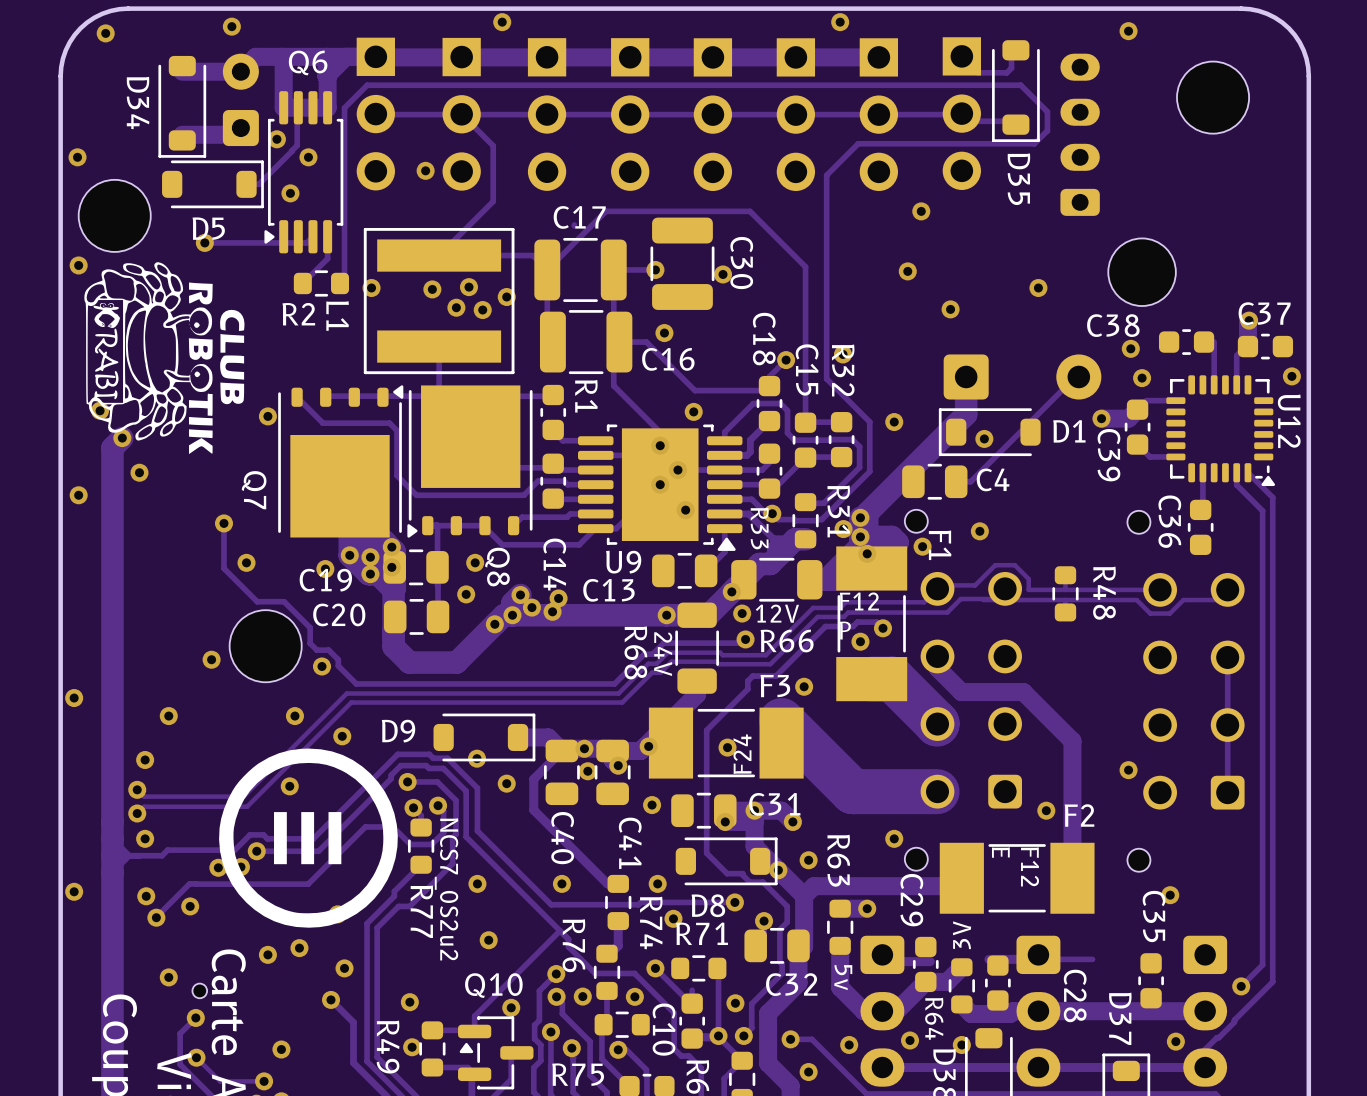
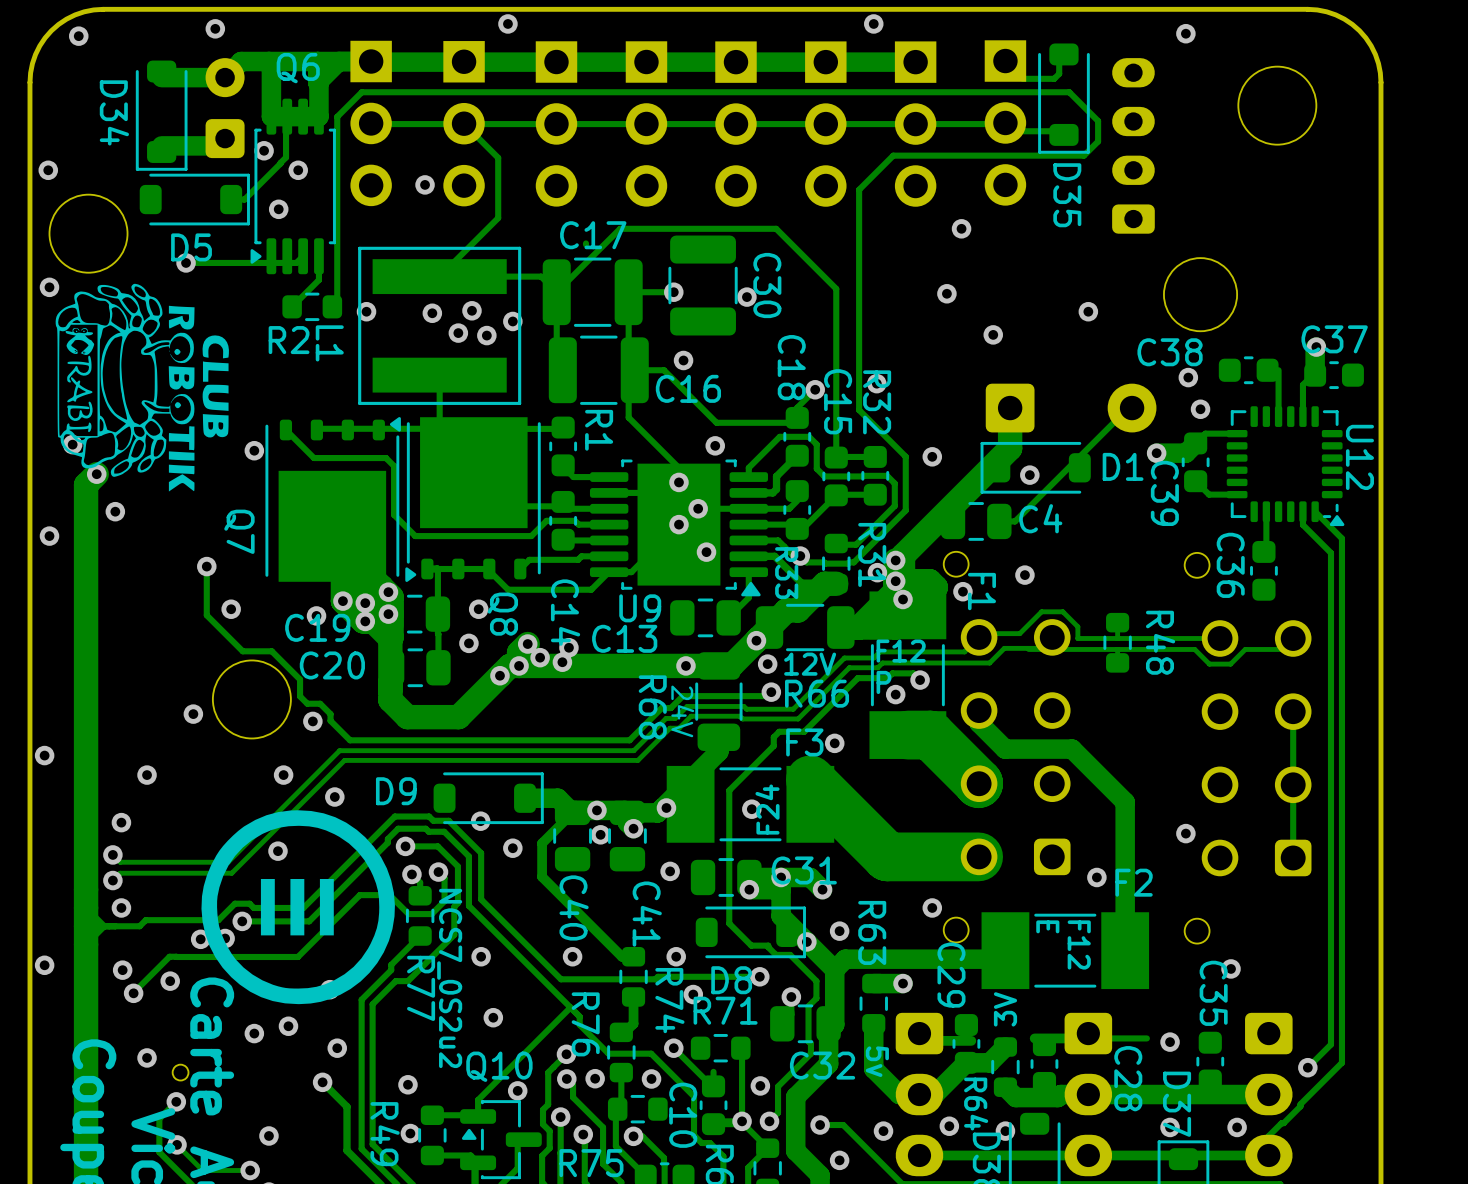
via: (1291, 376) -> none
via: none -> (1170, 1042)
via: none -> (1170, 1127)

